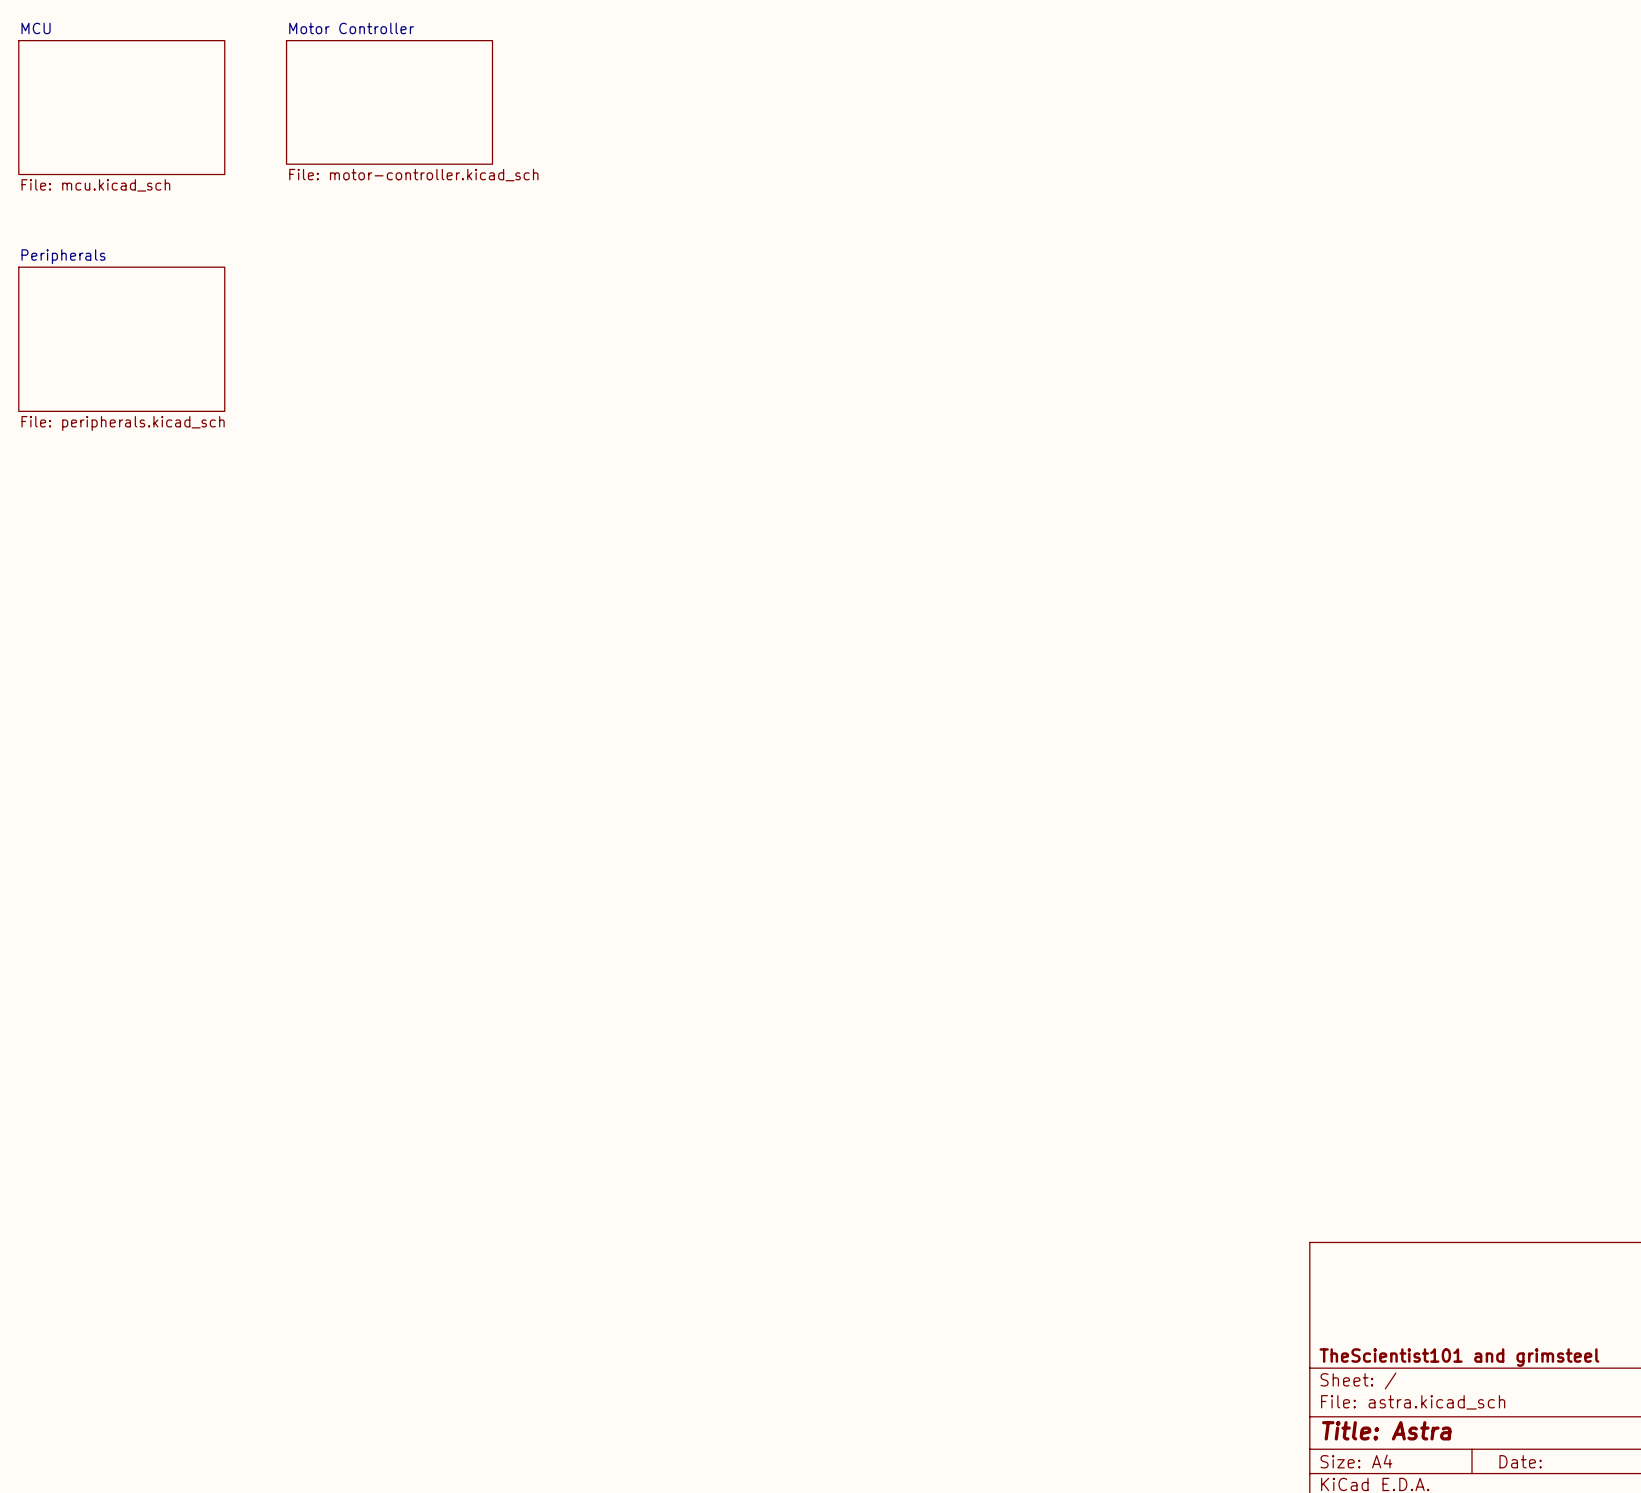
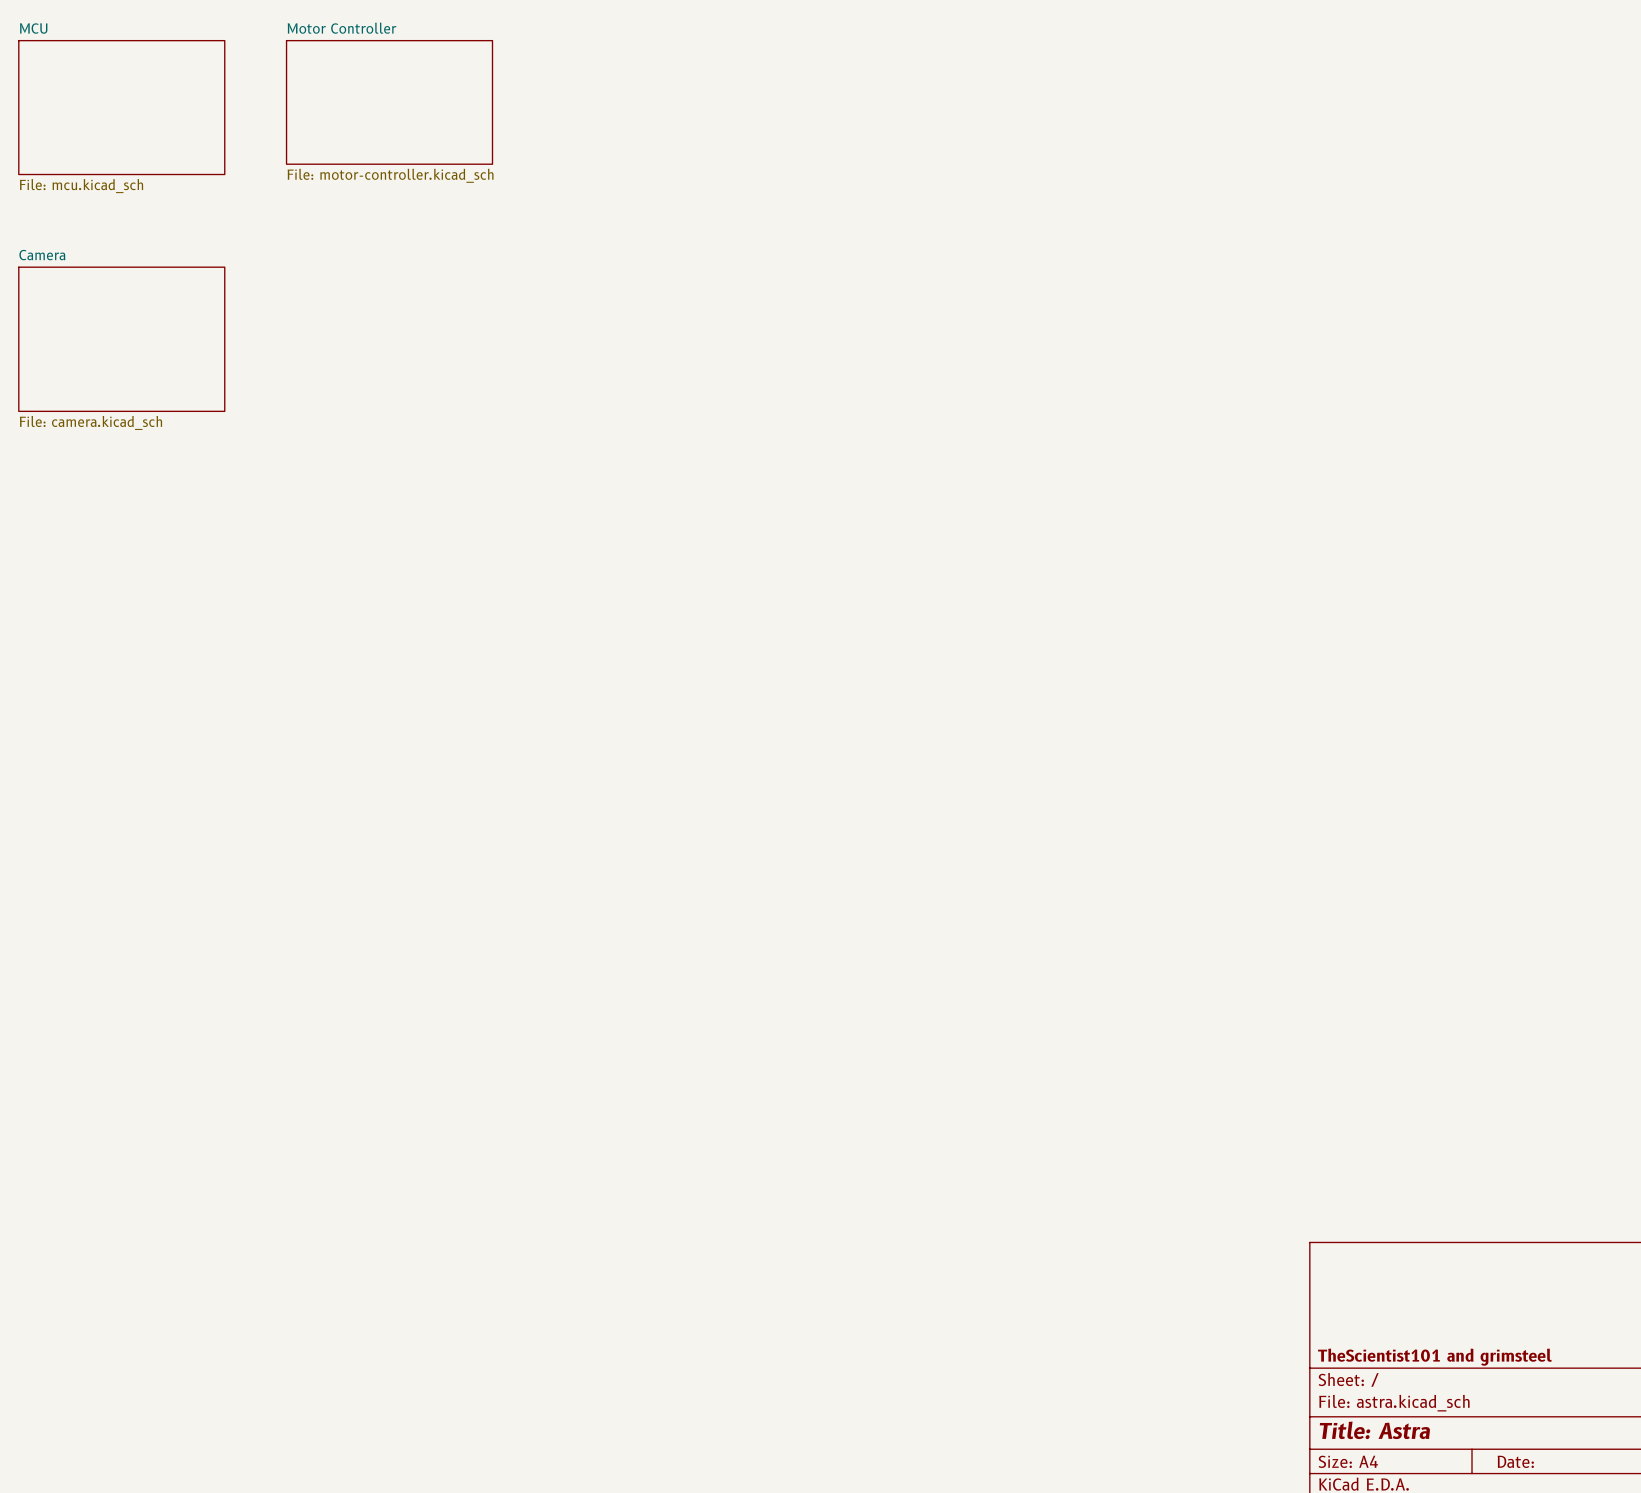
sheet Peripherals name: Peripherals (63, 256) -> Camera (42, 255)
sheet Peripherals value: File: peripherals.kicad_sch (123, 423) -> File: camera.kicad_sch (90, 422)

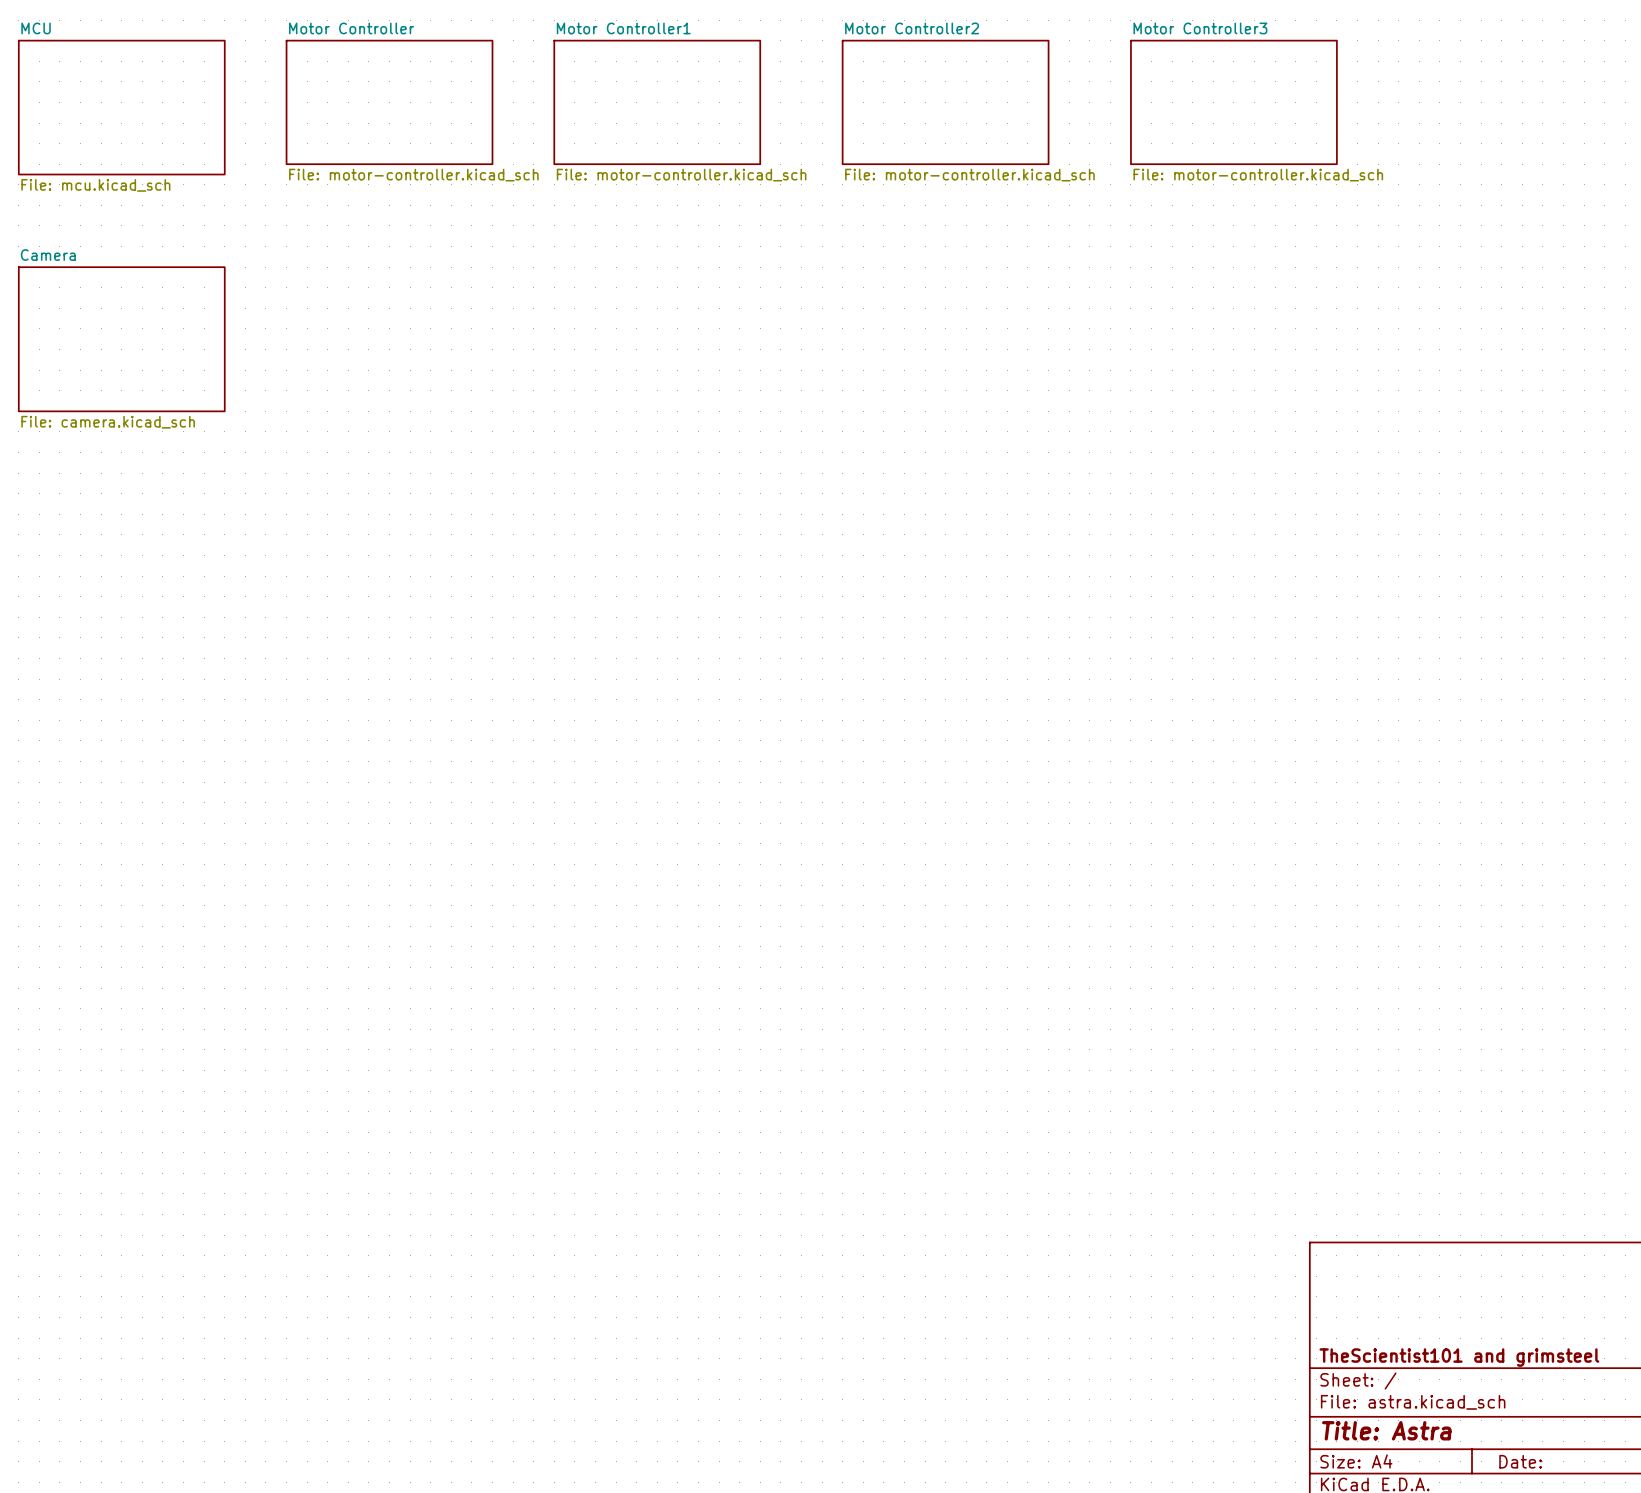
sheet Motor Controller1: none -> File: motor-controller.kicad_sch (657, 102)
sheet Motor Controller2: none -> File: motor-controller.kicad_sch (945, 102)
sheet Motor Controller3: none -> File: motor-controller.kicad_sch (1233, 102)

